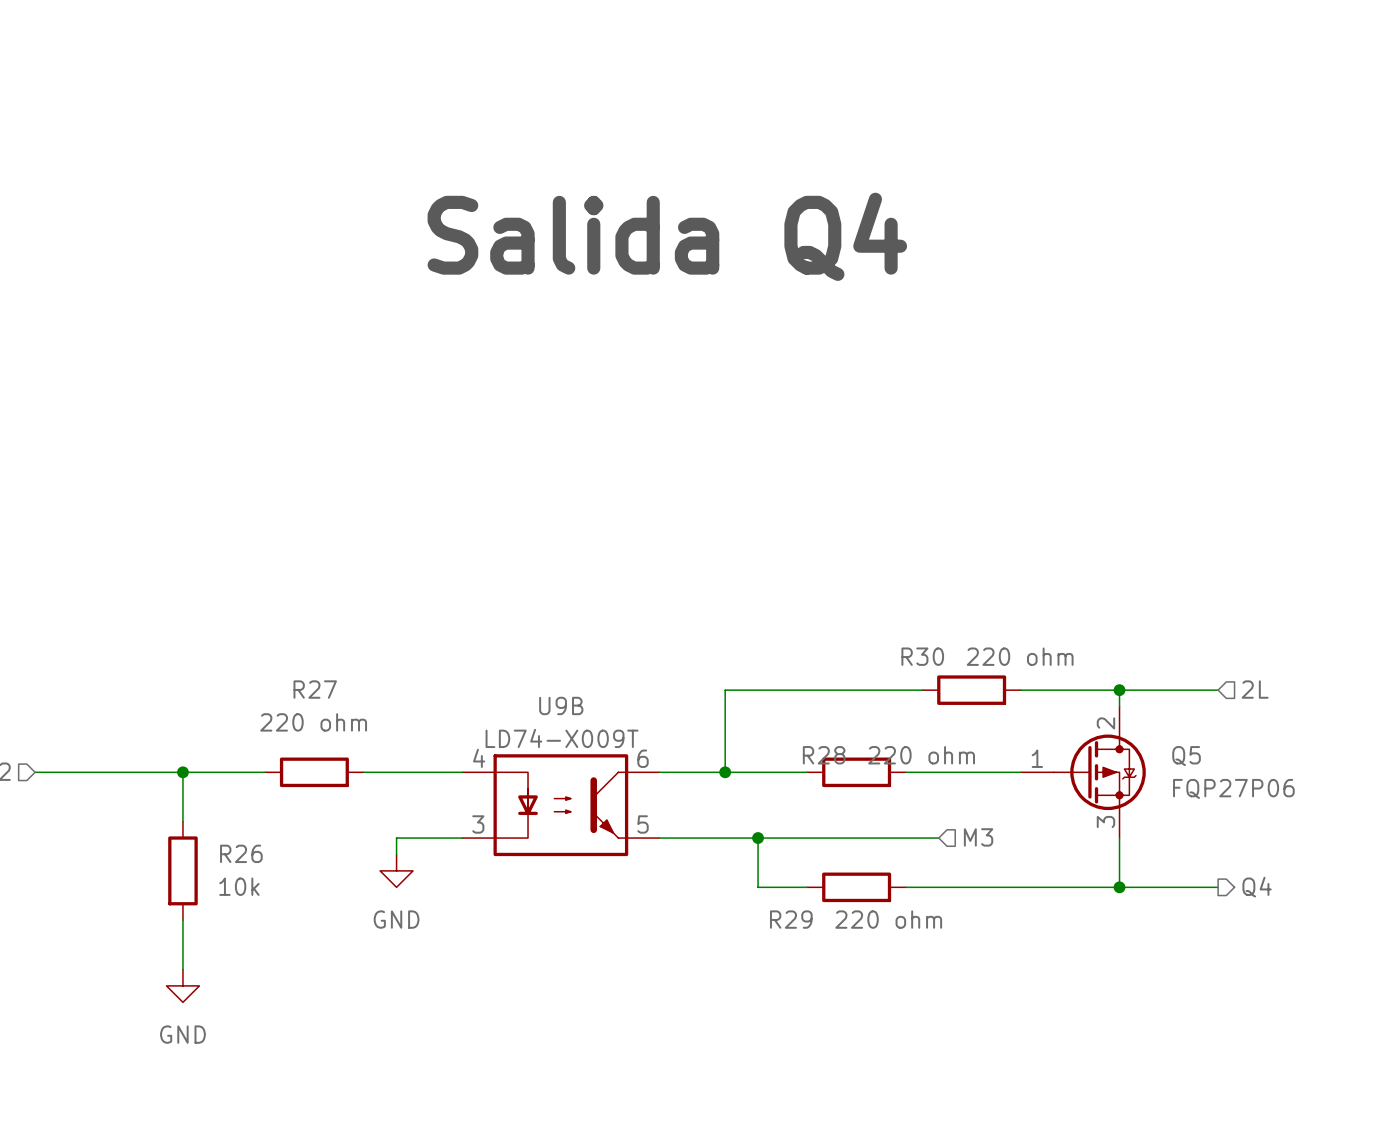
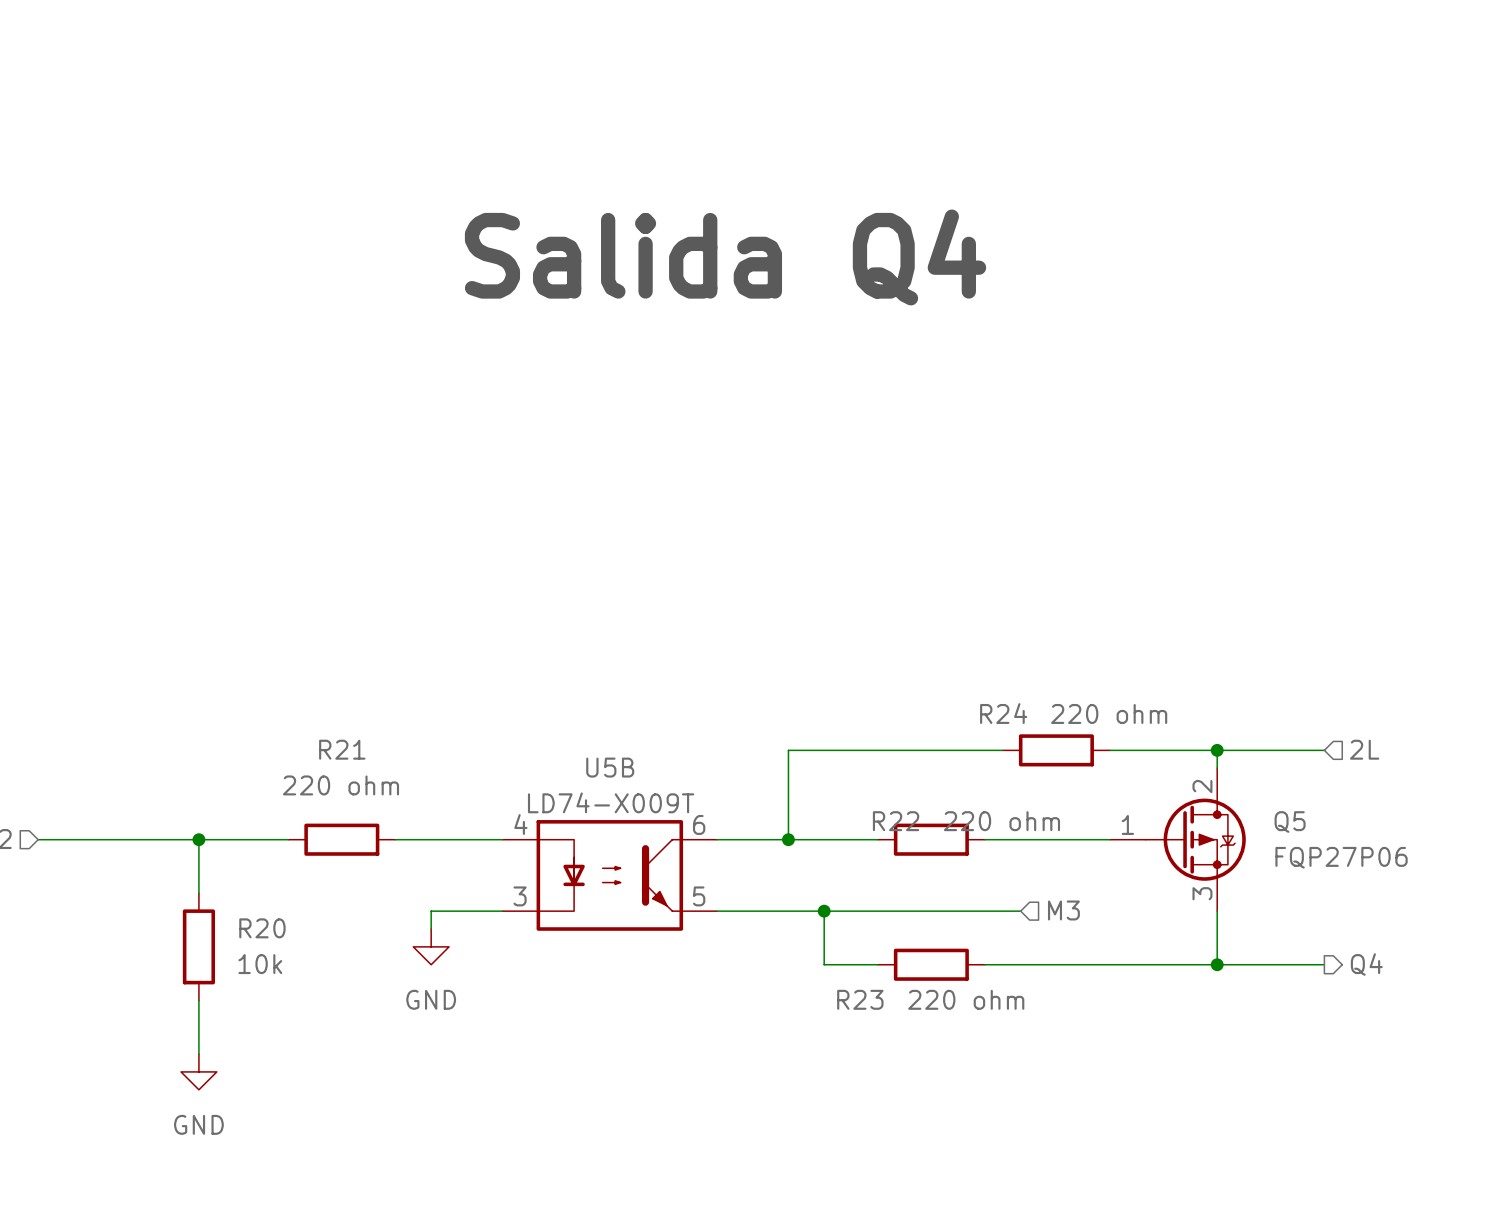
R30 name: R30 (922, 656) -> R24 (1003, 713)
R27 name: R27 (315, 689) -> R21 (342, 749)
U9B name: U9B (561, 705) -> U5B (610, 767)
R28 name: R28 (824, 755) -> R22 (896, 821)
R26 name: R26 (241, 853) -> R20 (262, 928)
R29 name: R29 (791, 919) -> R23 (860, 999)

